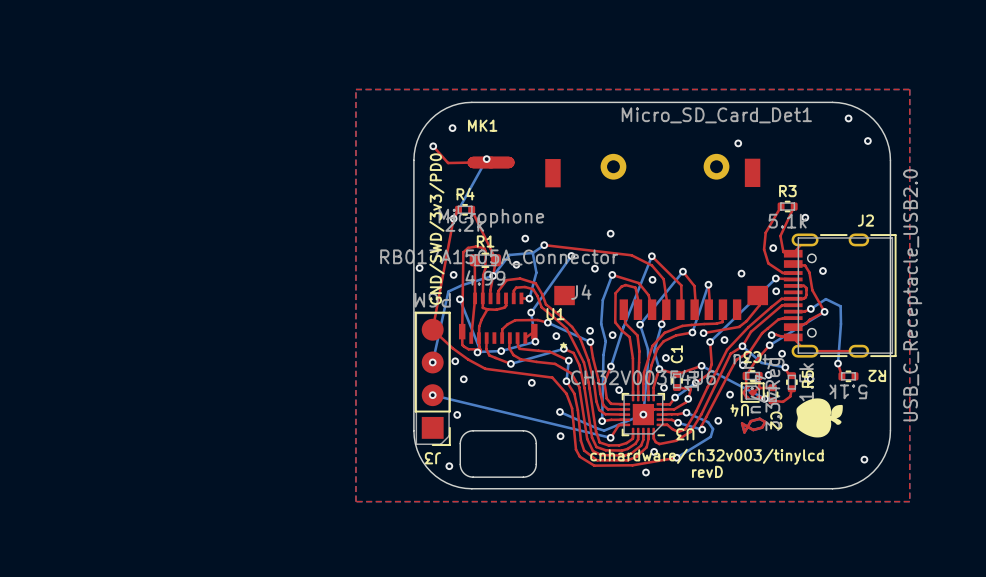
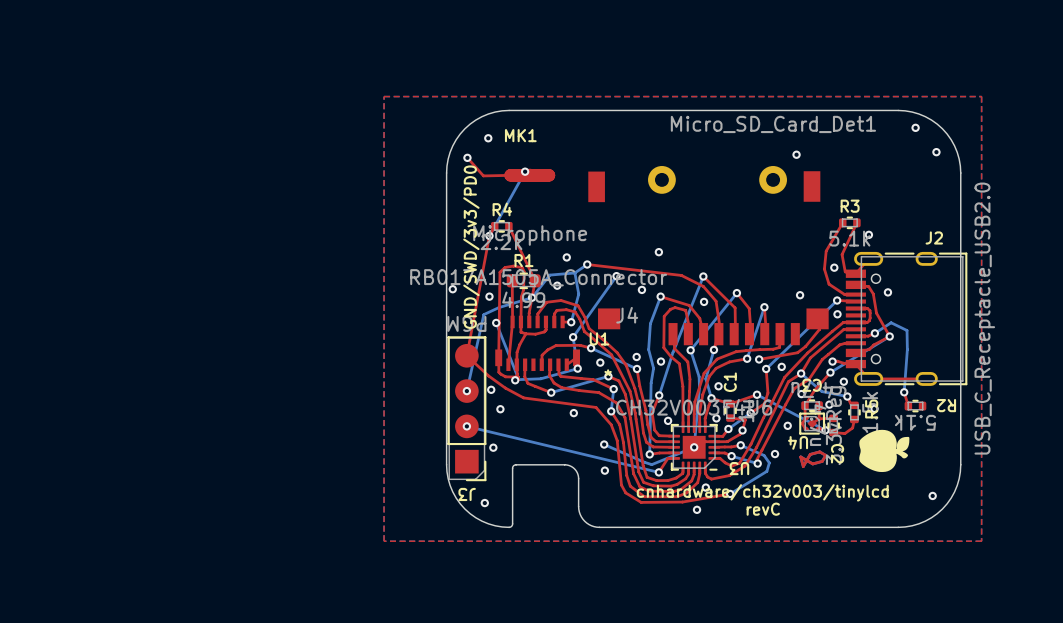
via: (501, 351) -> none
board edge: (478, 430) (466, 432) (460, 440) (460, 465) (466, 475) (473, 477) (524, 477) (533, 472) (536, 464) -> (516, 464) (512, 467) (512, 524) (509, 527)
text: revD (707, 471) -> revC (763, 509)
board edge: (471, 488) (555, 488) -> (578, 500) (579, 511) (582, 519) (591, 525) (599, 527)

